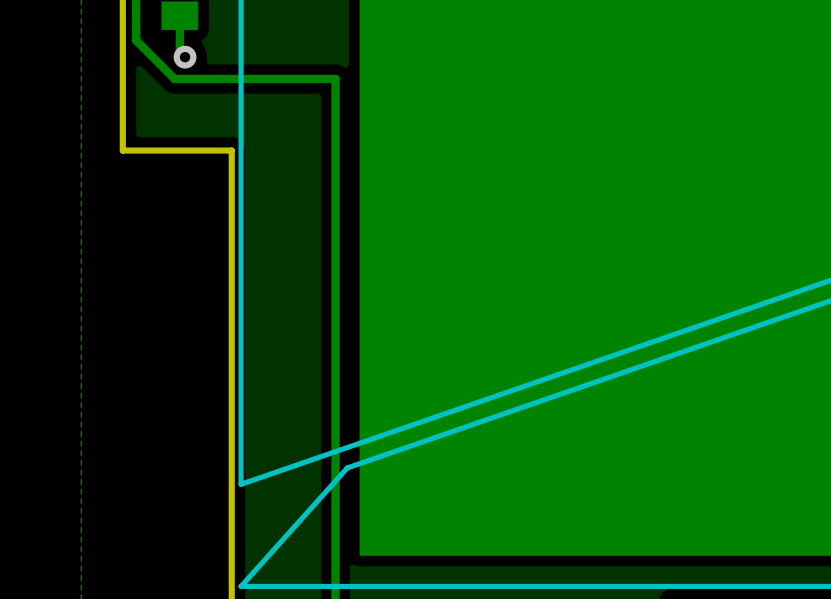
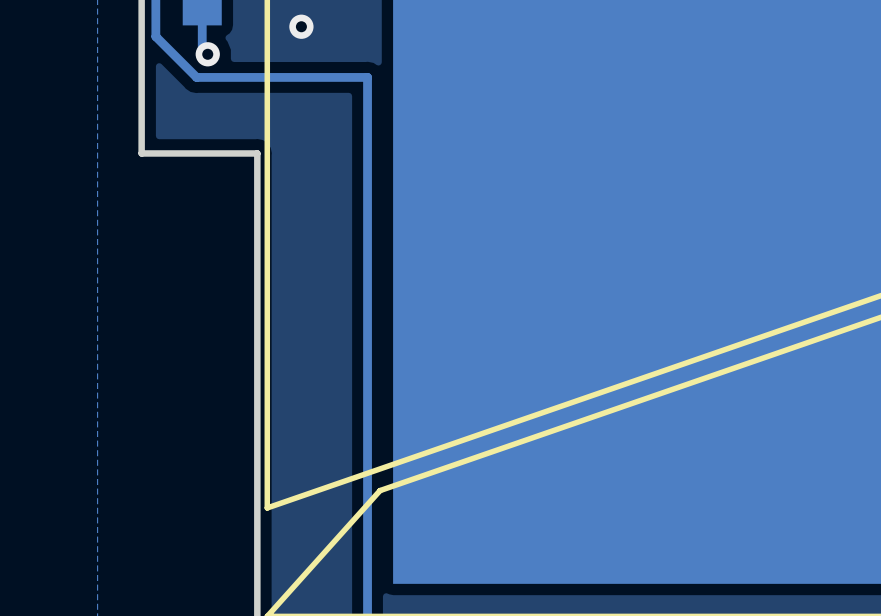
via: none -> (301, 26)

